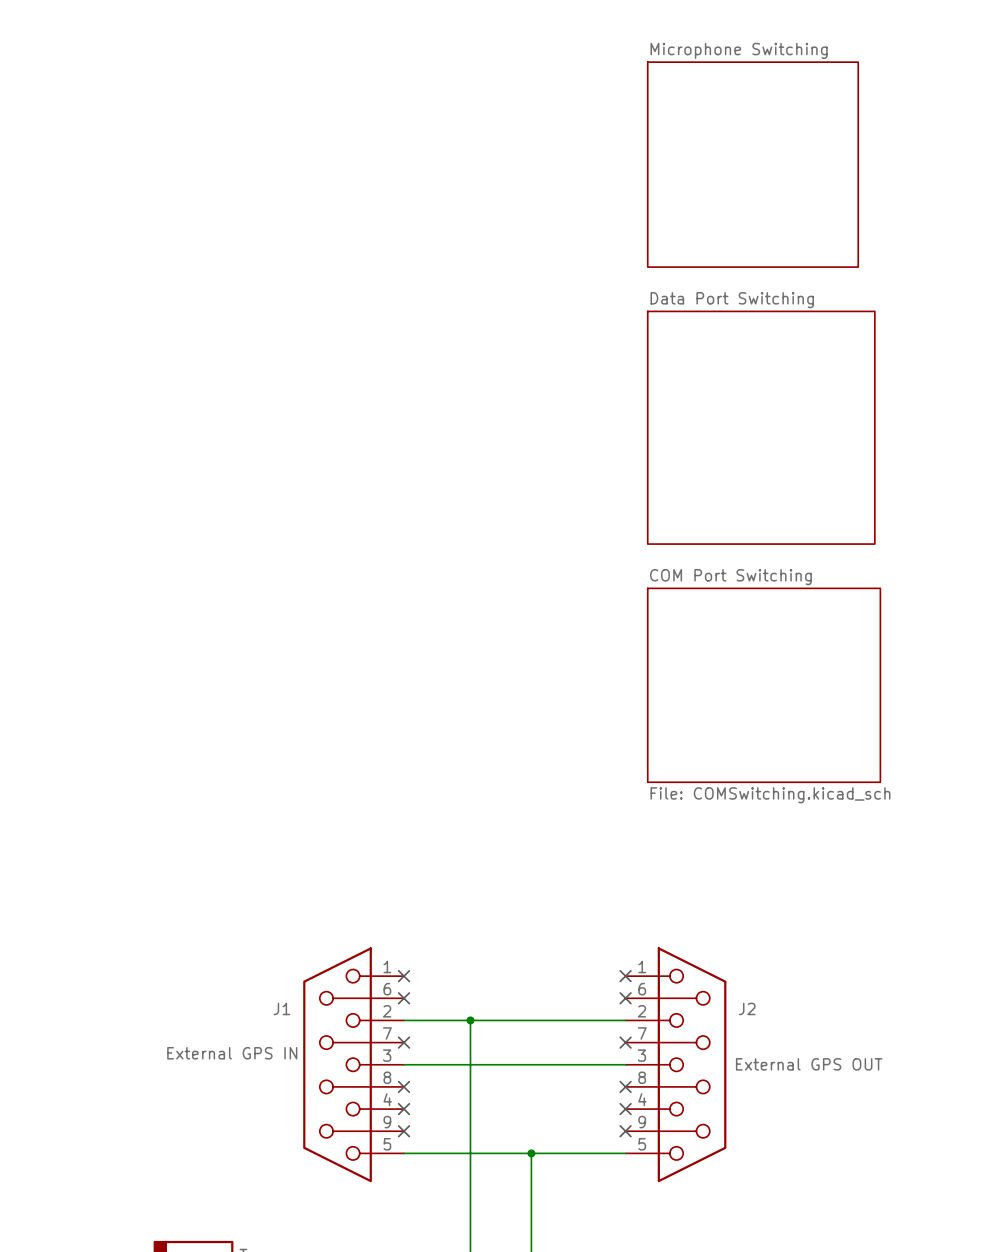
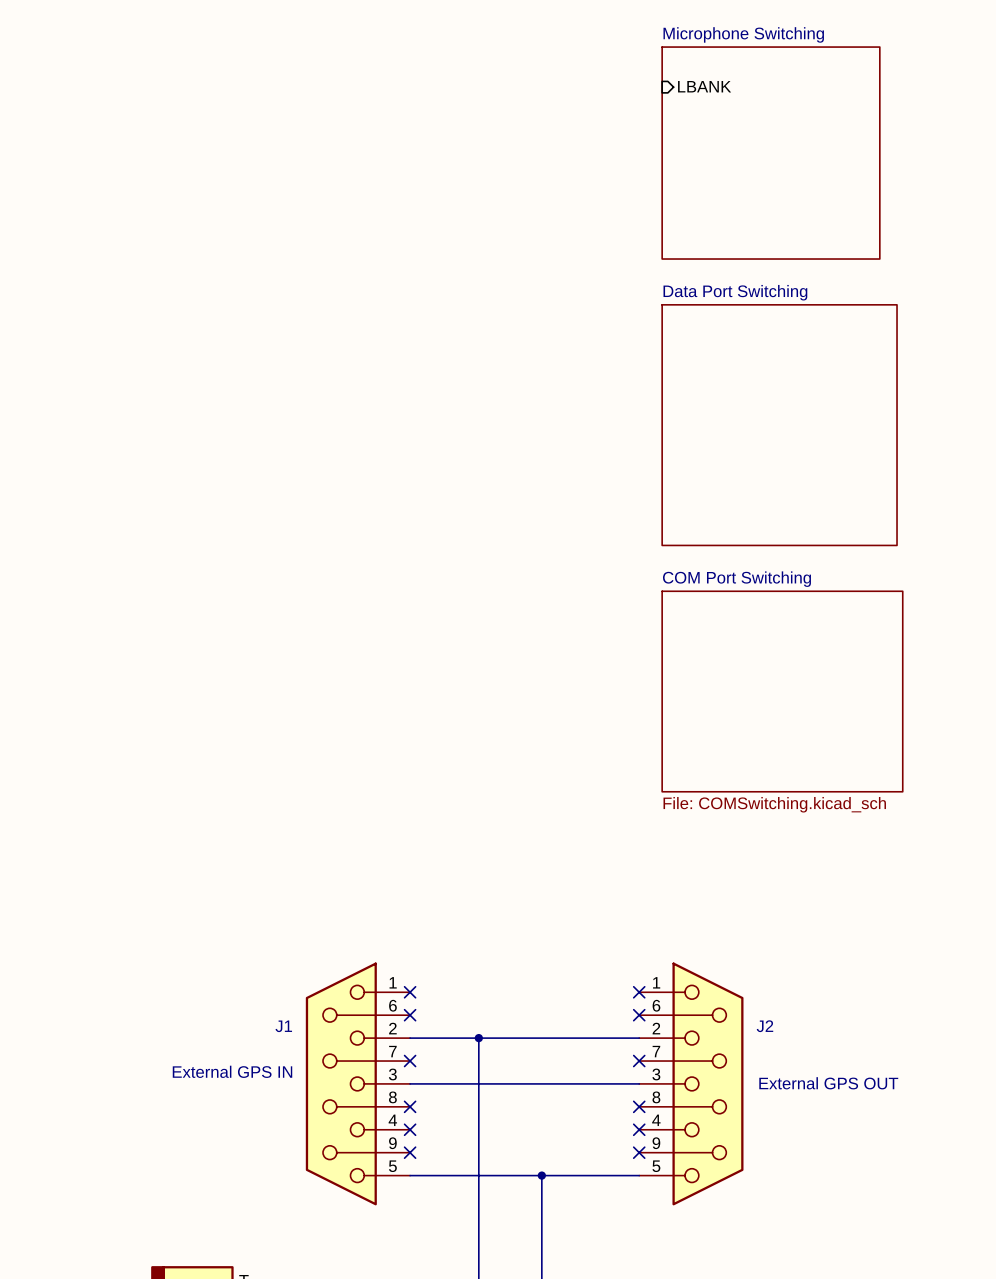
sheet pin: none -> LBANK (704, 86)

